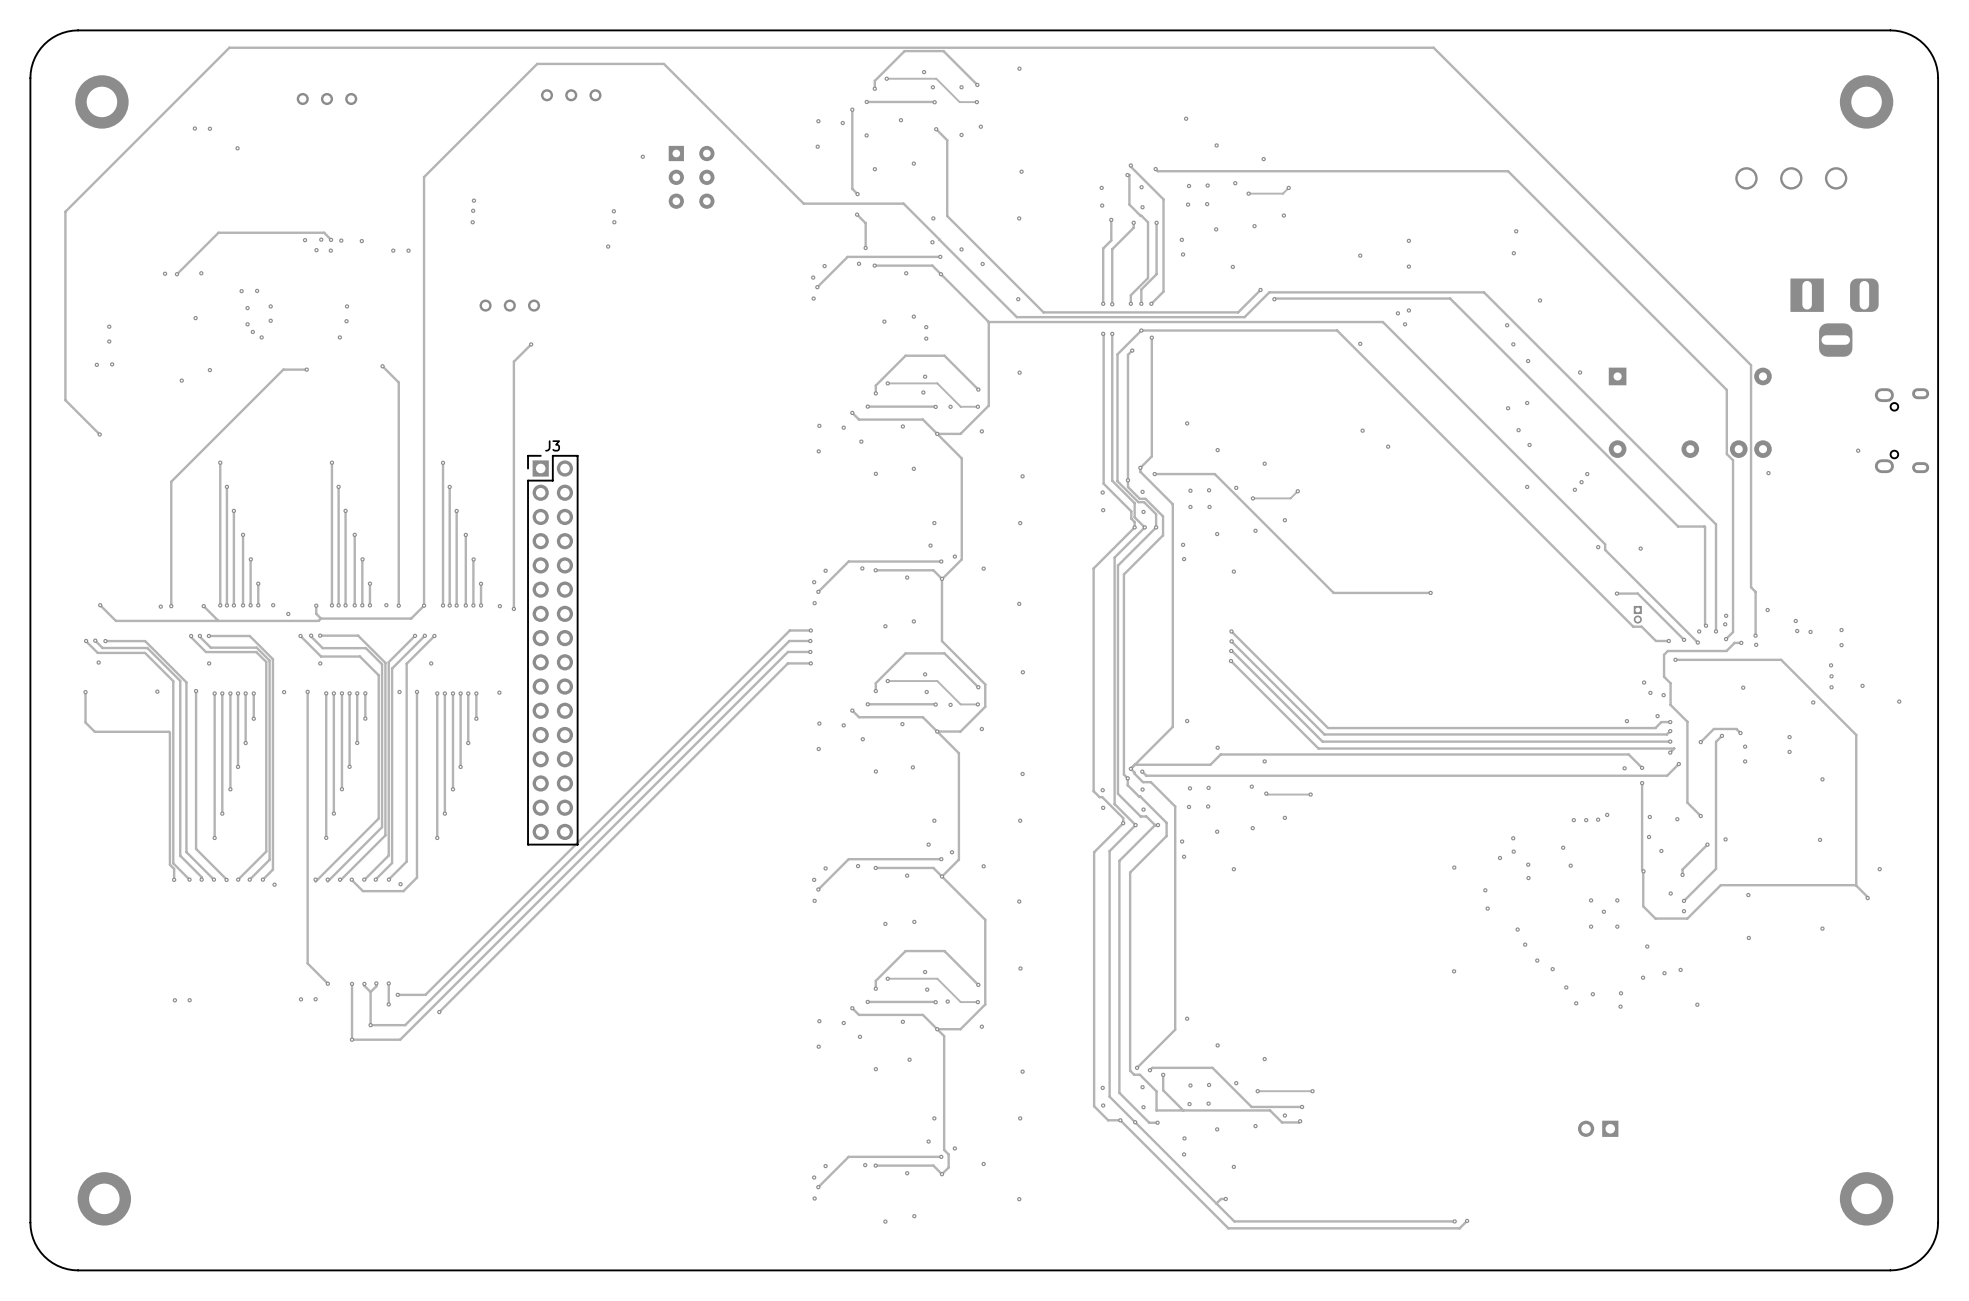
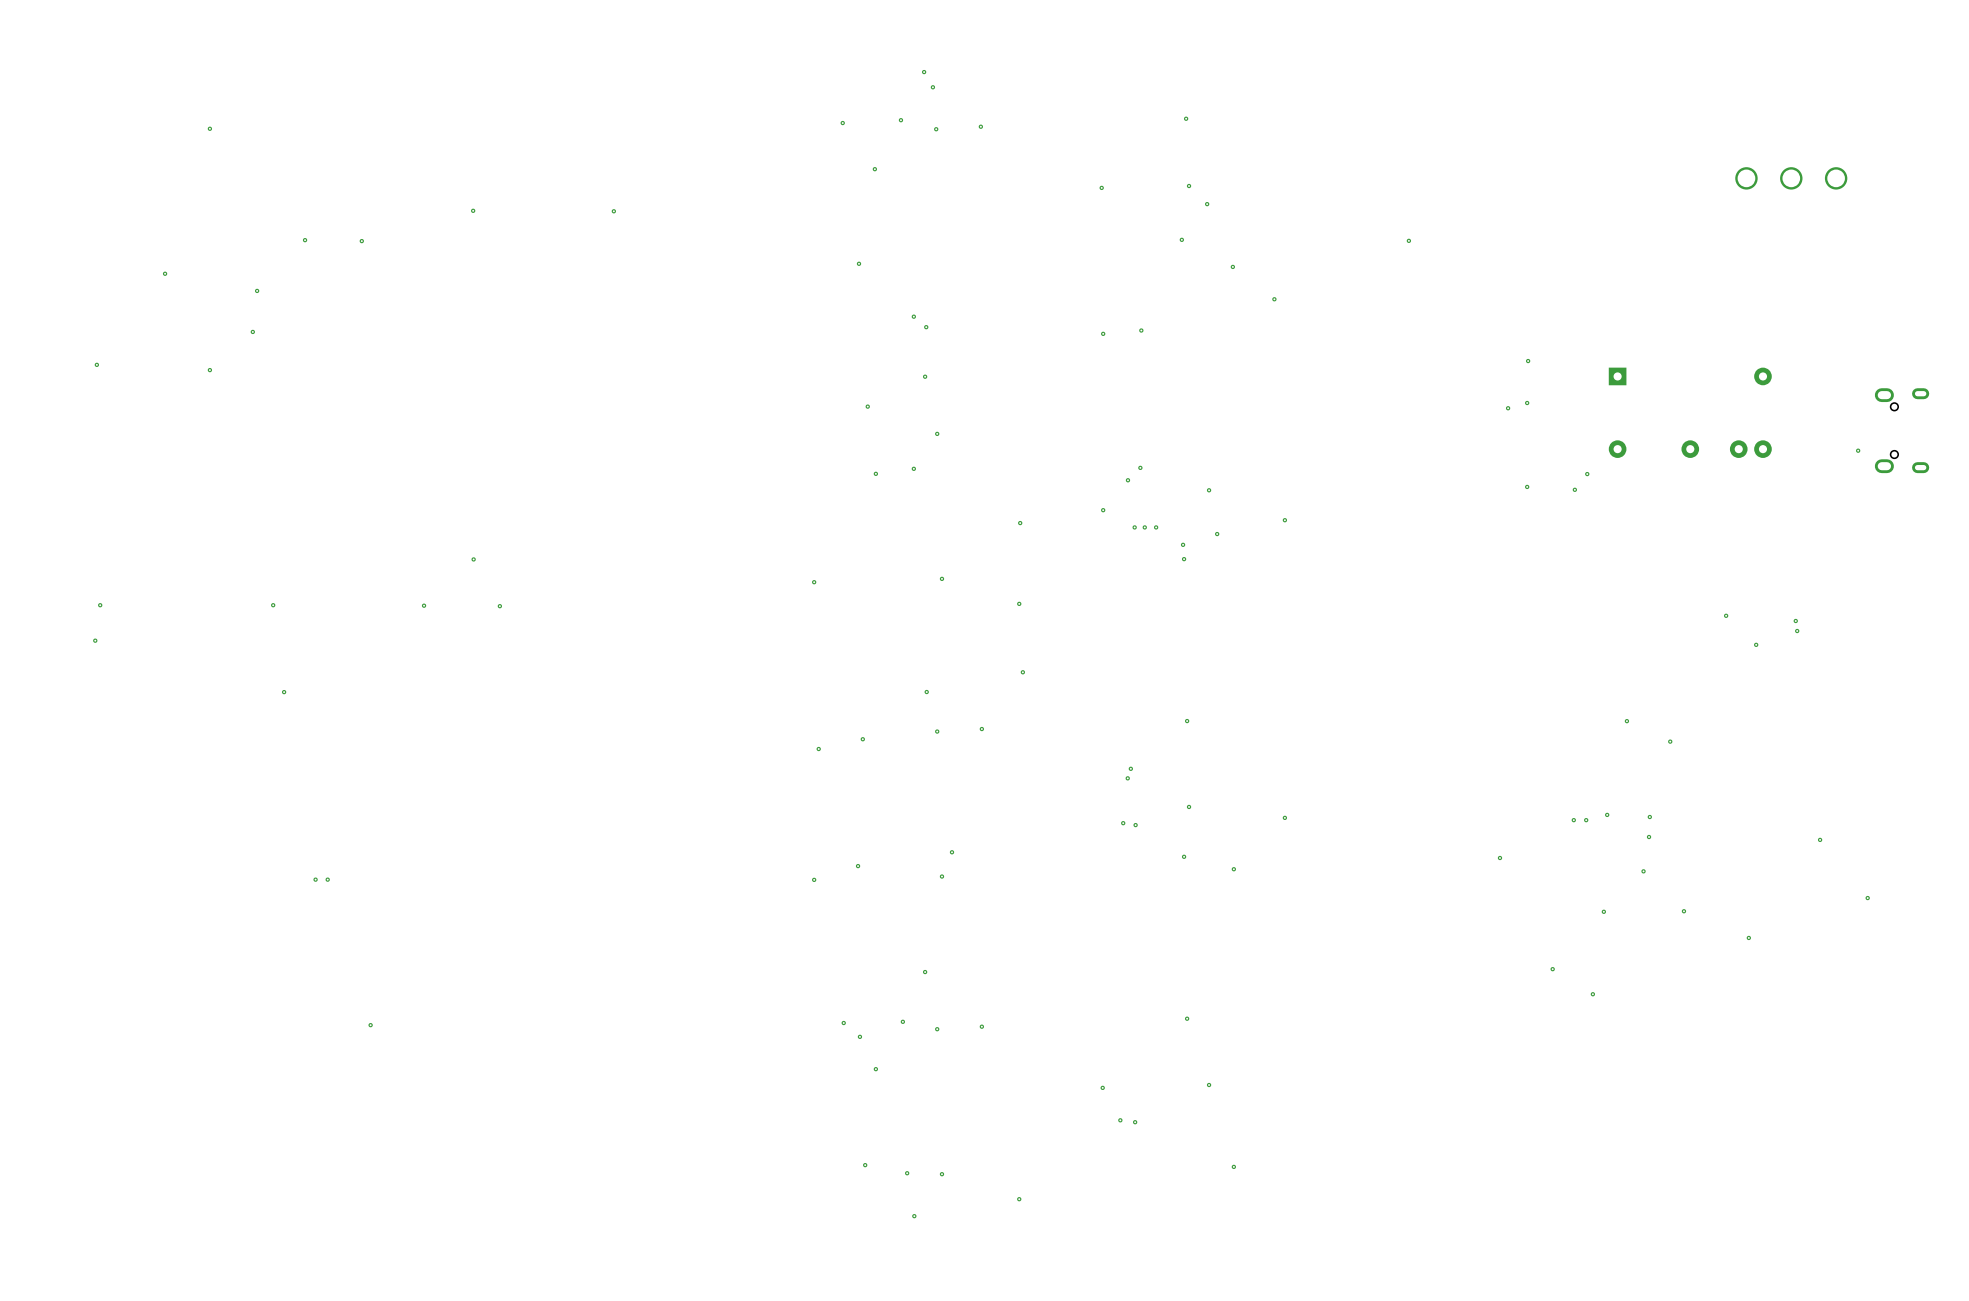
board edge: (1890, 30) (78, 30) (62, 33) (52, 37) (44, 44) (35, 57) (30, 78) (30, 1222) (31, 1233) (37, 1248) (52, 1263) (62, 1267) (78, 1270) (1890, 1270) (1901, 1269) (1915, 1263) (1930, 1248) (1935, 1238) (1938, 1222) (1938, 78) (1933, 57) (1924, 44) (1911, 35) (1890, 30) -> none
via: (1019, 68) -> none
track: (886, 78) (936, 78) (959, 102) (976, 102) -> none
via: (886, 78) -> none
track: (977, 84) (943, 51) (904, 51) (874, 80) (874, 88) -> none
via: (977, 84) -> none
via: (961, 87) -> none
via: (874, 88) -> none
part: (571, 95) -> none
part: (326, 98) -> none
part: (101, 101) -> none
track: (866, 101) (934, 102) -> none
via: (866, 101) -> none
part: (1866, 101) -> none
via: (934, 102) -> none
via: (976, 102) -> none
track: (852, 109) (852, 188) (857, 194) -> none
via: (852, 109) -> none
via: (818, 121) -> none
via: (194, 128) -> none
track: (936, 129) (947, 140) (947, 216) (1043, 312) (1238, 312) (1260, 289) -> none
via: (961, 134) -> none
via: (866, 135) -> none
via: (1216, 145) -> none
via: (817, 146) -> none
via: (237, 148) -> none
via: (642, 156) -> none
via: (1263, 159) -> none
via: (913, 163) -> none
track: (1130, 165) (1163, 199) (1163, 291) (1151, 303) -> none
via: (1130, 165) -> none
track: (1155, 169) (1157, 171) (1508, 171) (1726, 389) (1726, 454) (1733, 460) (1733, 632) (1726, 639) -> none
via: (1155, 169) -> none
via: (1021, 171) -> none
track: (1127, 175) (1129, 175) (1129, 204) (1148, 222) (1148, 278) (1130, 295) (1130, 303) -> none
via: (1127, 175) -> none
part: (691, 177) -> none
via: (1235, 183) -> none
via: (1207, 185) -> none
via: (1141, 187) -> none
track: (1288, 187) (1282, 193) (1248, 193) -> none
via: (1288, 187) -> none
via: (1248, 193) -> none
via: (857, 194) -> none
via: (473, 200) -> none
via: (1188, 204) -> none
via: (1102, 205) -> none
via: (1142, 207) -> none
track: (857, 214) (865, 223) (865, 248) -> none
via: (857, 214) -> none
via: (1283, 215) -> none
via: (933, 218) -> none
via: (1019, 218) -> none
track: (1111, 219) (1111, 240) (1103, 248) (1103, 303) -> none
via: (1111, 219) -> none
via: (472, 222) -> none
via: (614, 222) -> none
track: (1133, 222) (1133, 227) (1112, 249) (1112, 304) -> none
via: (1133, 222) -> none
track: (1156, 222) (1156, 274) (1141, 289) (1141, 303) -> none
via: (1156, 222) -> none
via: (1254, 226) -> none
via: (1216, 229) -> none
via: (1516, 231) -> none
via: (321, 239) -> none
track: (331, 239) (324, 232) (218, 232) (176, 274) -> none
via: (331, 239) -> none
via: (341, 240) -> none
via: (932, 242) -> none
via: (608, 246) -> none
via: (865, 248) -> none
via: (961, 249) -> none
via: (316, 250) -> none
via: (330, 250) -> none
via: (393, 250) -> none
via: (408, 250) -> none
via: (1513, 253) -> none
via: (1183, 254) -> none
via: (1360, 255) -> none
track: (940, 256) (847, 256) (817, 287) -> none
via: (940, 256) -> none
via: (982, 263) -> none
track: (874, 265) (932, 265) (988, 322) -> none
via: (874, 265) -> none
via: (824, 266) -> none
via: (1408, 266) -> none
via: (201, 273) -> none
via: (906, 273) -> none
via: (176, 274) -> none
via: (940, 274) -> none
via: (813, 277) -> none
via: (817, 287) -> none
via: (1260, 289) -> none
via: (241, 291) -> none
via: (813, 298) -> none
via: (1018, 299) -> none
track: (1274, 299) (1450, 298) (1678, 526) (1705, 527) (1706, 625) -> none
via: (1540, 300) -> none
via: (1103, 303) -> none
via: (1130, 303) -> none
via: (1141, 303) -> none
via: (1151, 303) -> none
via: (1112, 304) -> none
part: (509, 305) -> none
via: (270, 306) -> none
via: (347, 306) -> none
via: (247, 308) -> none
via: (1408, 310) -> none
via: (1397, 313) -> none
part: (1834, 317) -> none
via: (195, 318) -> none
via: (270, 320) -> none
via: (346, 321) -> none
via: (884, 321) -> none
track: (988, 322) (988, 405) (960, 433) (937, 433) -> none
track: (988, 322) (1382, 322) (1605, 544) (1605, 549) (1697, 642) -> none
via: (247, 324) -> none
via: (1405, 324) -> none
via: (1507, 325) -> none
via: (109, 326) -> none
track: (1103, 333) (1103, 483) (1131, 511) (1134, 527) (1093, 568) (1093, 791) (1123, 818) (1123, 823) (1094, 852) (1094, 1106) (1108, 1120) (1120, 1120) (1228, 1228) (1459, 1228) (1467, 1220) -> none
track: (1112, 333) (1112, 480) (1134, 503) (1134, 517) (1144, 527) (1114, 557) (1114, 804) (1135, 825) (1109, 851) (1109, 1096) (1234, 1221) (1454, 1221) -> none
via: (1112, 333) -> none
via: (261, 337) -> none
via: (339, 337) -> none
track: (1151, 337) (1151, 456) (1140, 467) (1140, 471) (1172, 504) (1172, 726) (1130, 768) (1143, 782) (1150, 782) (1175, 806) (1175, 1029) (1137, 1067) -> none
via: (1151, 337) -> none
via: (926, 338) -> none
via: (109, 341) -> none
via: (1360, 343) -> none
track: (531, 344) (513, 361) (513, 608) -> none
via: (531, 344) -> none
via: (1513, 344) -> none
track: (1132, 350) (1127, 354) (1127, 487) (1139, 498) (1145, 498) (1163, 516) (1163, 535) (1123, 574) (1123, 774) (1127, 778) (1127, 785) (1166, 822) (1166, 836) (1130, 872) (1130, 1070) (1134, 1074) (1139, 1074) (1156, 1091) (1156, 1110) (1270, 1110) (1282, 1122) (1300, 1121) -> none
via: (1132, 350) -> none
via: (112, 364) -> none
track: (382, 366) (398, 382) (398, 605) -> none
via: (382, 366) -> none
track: (306, 369) (283, 369) (171, 481) (171, 606) -> none
via: (306, 369) -> none
via: (1019, 372) -> none
via: (1580, 372) -> none
via: (181, 380) -> none
track: (887, 383) (937, 383) (960, 406) (977, 406) -> none
via: (887, 383) -> none
track: (978, 389) (944, 355) (905, 355) (875, 385) (875, 393) -> none
via: (978, 389) -> none
via: (923, 392) -> none
via: (875, 393) -> none
track: (867, 406) (935, 406) -> none
via: (935, 406) -> none
via: (950, 406) -> none
via: (977, 406) -> none
track: (852, 412) (858, 419) (922, 419) (961, 458) (961, 559) (941, 578) -> none
via: (852, 412) -> none
via: (1187, 423) -> none
via: (819, 425) -> none
via: (902, 426) -> none
via: (843, 427) -> none
via: (1362, 430) -> none
via: (1518, 430) -> none
via: (981, 431) -> none
track: (99, 434) (65, 400) (65, 211) (229, 47) (1433, 47) (1751, 365) (1751, 587) (1755, 591) (1755, 635) -> none
via: (99, 434) -> none
via: (861, 441) -> none
via: (1529, 444) -> none
via: (1388, 446) -> none
via: (1217, 450) -> none
via: (818, 451) -> none
track: (220, 462) (220, 605) -> none
via: (220, 462) -> none
track: (331, 462) (331, 605) -> none
via: (331, 462) -> none
track: (443, 462) (443, 605) -> none
via: (443, 462) -> none
via: (1264, 463) -> none
via: (1768, 473) -> none
track: (1154, 474) (1214, 474) (1333, 592) (1430, 592) -> none
via: (1154, 474) -> none
via: (1022, 476) -> none
via: (1581, 482) -> none
track: (226, 486) (226, 605) -> none
via: (226, 486) -> none
track: (338, 486) (338, 605) -> none
via: (338, 486) -> none
track: (449, 486) (449, 605) -> none
via: (449, 486) -> none
via: (1236, 487) -> none
via: (1190, 490) -> none
via: (1142, 491) -> none
track: (1297, 491) (1290, 498) (1252, 498) -> none
via: (1297, 491) -> none
via: (1102, 492) -> none
via: (1252, 498) -> none
via: (1190, 506) -> none
via: (1209, 506) -> none
track: (233, 510) (233, 605) -> none
via: (233, 510) -> none
track: (345, 510) (345, 605) -> none
via: (345, 510) -> none
track: (456, 510) (456, 605) -> none
via: (456, 510) -> none
via: (1143, 511) -> none
via: (934, 523) -> none
via: (1255, 530) -> none
track: (243, 534) (243, 605) -> none
via: (243, 534) -> none
track: (354, 534) (354, 605) -> none
via: (354, 534) -> none
track: (465, 534) (465, 605) -> none
via: (465, 534) -> none
via: (930, 545) -> none
via: (1598, 547) -> none
via: (1640, 548) -> none
via: (954, 556) -> none
track: (250, 559) (250, 605) -> none
via: (250, 559) -> none
track: (362, 559) (362, 605) -> none
via: (362, 559) -> none
track: (473, 559) (473, 605) -> none
track: (941, 561) (848, 561) (818, 591) -> none
via: (941, 561) -> none
via: (862, 568) -> none
via: (983, 568) -> none
via: (825, 570) -> none
track: (875, 570) (933, 570) (941, 578) -> none
via: (875, 570) -> none
via: (1233, 571) -> none
via: (907, 577) -> none
track: (941, 578) (941, 641) (985, 684) (985, 706) (960, 731) (937, 731) -> none
track: (258, 583) (258, 605) -> none
via: (258, 583) -> none
track: (369, 583) (369, 605) -> none
via: (369, 583) -> none
track: (481, 583) (481, 605) -> none
via: (481, 583) -> none
via: (818, 591) -> none
via: (1430, 592) -> none
track: (1616, 593) (1637, 593) (1684, 639) -> none
via: (1616, 593) -> none
via: (814, 603) -> none
track: (100, 605) (115, 620) (318, 620) (321, 618) -> none
via: (220, 605) -> none
via: (226, 605) -> none
via: (233, 605) -> none
via: (243, 605) -> none
via: (250, 605) -> none
via: (258, 605) -> none
track: (316, 605) (316, 613) (321, 618) -> none
via: (316, 605) -> none
via: (331, 605) -> none
via: (338, 605) -> none
via: (345, 605) -> none
via: (354, 605) -> none
via: (362, 605) -> none
via: (369, 605) -> none
via: (386, 605) -> none
via: (398, 605) -> none
via: (443, 605) -> none
via: (449, 605) -> none
via: (456, 605) -> none
via: (465, 605) -> none
via: (473, 605) -> none
via: (481, 605) -> none
via: (160, 606) -> none
via: (171, 606) -> none
track: (203, 606) (218, 620) -> none
via: (203, 606) -> none
via: (513, 608) -> none
via: (1767, 610) -> none
via: (288, 614) -> none
part: (1637, 614) -> none
track: (321, 618) (411, 618) (424, 605) (424, 177) (537, 63) (663, 63) (803, 203) (903, 203) (1016, 317) (1244, 317) (1269, 292) (1484, 292) (1716, 524) (1716, 631) -> none
via: (913, 621) -> none
via: (1725, 624) -> none
via: (1706, 625) -> none
via: (885, 626) -> none
track: (810, 630) (789, 630) (425, 994) (397, 994) -> none
via: (810, 630) -> none
via: (1841, 630) -> none
track: (1231, 631) (1328, 728) (1655, 728) (1661, 722) (1670, 722) -> none
via: (1231, 631) -> none
via: (1699, 631) -> none
via: (1716, 631) -> none
via: (1810, 631) -> none
track: (191, 635) (205, 652) (256, 652) (266, 661) (266, 851) (238, 879) -> none
via: (191, 635) -> none
track: (199, 635) (210, 647) (256, 647) (269, 660) (269, 859) (249, 879) -> none
via: (199, 635) -> none
track: (208, 635) (249, 635) (272, 659) (272, 869) (262, 879) -> none
via: (208, 635) -> none
track: (300, 635) (321, 656) (359, 656) (378, 675) (378, 818) (315, 881) -> none
via: (300, 635) -> none
track: (311, 635) (322, 648) (365, 648) (382, 664) (382, 827) (327, 881) -> none
via: (311, 635) -> none
track: (320, 635) (358, 635) (385, 662) (385, 835) (340, 880) -> none
via: (320, 635) -> none
track: (415, 635) (388, 662) (388, 855) (364, 879) -> none
via: (415, 635) -> none
track: (424, 635) (392, 668) (392, 863) (375, 879) -> none
via: (424, 635) -> none
track: (434, 635) (406, 663) (406, 861) (388, 879) -> none
via: (434, 635) -> none
via: (1755, 635) -> none
via: (1684, 639) -> none
via: (1726, 639) -> none
track: (86, 640) (97, 652) (145, 652) (173, 681) (173, 863) (189, 879) -> none
via: (86, 640) -> none
track: (95, 640) (102, 648) (147, 648) (180, 680) (180, 855) (201, 877) (201, 879) -> none
track: (810, 640) (789, 640) (405, 1025) (370, 1025) (370, 992) -> none
via: (810, 640) -> none
track: (1668, 640) (1655, 640) (1641, 626) (1633, 626) (1337, 330) (1141, 330) (1117, 354) (1117, 481) (1138, 502) (1144, 502) (1156, 514) (1156, 527) (1117, 565) (1117, 793) (1140, 816) (1146, 816) (1154, 825) (1158, 825) -> none
via: (1668, 640) -> none
track: (105, 641) (145, 641) (186, 682) (186, 852) (213, 879) -> none
via: (105, 641) -> none
track: (1231, 641) (1324, 734) (1666, 734) (1670, 731) -> none
via: (1231, 641) -> none
via: (1697, 642) -> none
track: (1741, 642) (1734, 642) (1726, 651) (1667, 651) (1664, 654) (1664, 676) (1670, 683) (1670, 704) (1687, 721) (1687, 802) (1700, 816) -> none
via: (1741, 642) -> none
via: (1841, 645) -> none
J3: (552, 650) -> none
track: (810, 651) (787, 651) (400, 1039) (352, 1039) (352, 983) -> none
via: (810, 651) -> none
track: (1231, 651) (1322, 741) (1670, 741) -> none
via: (1231, 651) -> none
track: (1675, 659) (1781, 659) (1856, 734) (1856, 885) -> none
via: (1675, 659) -> none
track: (1231, 661) (1318, 748) (1674, 748) (1670, 752) -> none
via: (1231, 661) -> none
via: (98, 662) -> none
via: (209, 663) -> none
via: (320, 663) -> none
via: (431, 663) -> none
track: (810, 663) (787, 663) (439, 1012) -> none
via: (810, 663) -> none
via: (1831, 665) -> none
via: (925, 674) -> none
via: (1831, 676) -> none
track: (887, 681) (937, 681) (960, 704) (977, 704) -> none
via: (887, 681) -> none
via: (1644, 682) -> none
via: (1862, 685) -> none
track: (978, 687) (944, 653) (905, 653) (875, 683) (875, 691) -> none
via: (978, 687) -> none
via: (1743, 687) -> none
via: (1831, 687) -> none
via: (157, 691) -> none
track: (196, 691) (196, 848) (226, 879) -> none
via: (196, 691) -> none
track: (307, 691) (307, 963) (327, 983) -> none
via: (307, 691) -> none
track: (416, 691) (416, 877) (403, 891) (362, 891) (351, 879) -> none
via: (416, 691) -> none
via: (875, 691) -> none
track: (85, 692) (85, 722) (94, 731) (169, 732) (169, 864) (174, 868) (174, 879) -> none
via: (85, 692) -> none
via: (399, 692) -> none
via: (499, 692) -> none
via: (1650, 692) -> none
track: (214, 693) (214, 837) -> none
via: (214, 693) -> none
track: (222, 693) (222, 813) -> none
via: (222, 693) -> none
track: (230, 693) (230, 789) -> none
via: (230, 693) -> none
track: (238, 693) (238, 766) -> none
via: (238, 693) -> none
track: (245, 693) (245, 743) -> none
via: (245, 693) -> none
track: (253, 693) (253, 718) -> none
via: (253, 693) -> none
track: (326, 693) (326, 837) -> none
via: (326, 693) -> none
track: (333, 693) (333, 813) -> none
via: (333, 693) -> none
track: (341, 693) (341, 789) -> none
via: (341, 693) -> none
track: (349, 693) (349, 766) -> none
via: (349, 693) -> none
track: (357, 693) (357, 742) -> none
via: (357, 693) -> none
track: (365, 693) (365, 718) -> none
via: (365, 693) -> none
track: (437, 693) (437, 837) -> none
via: (437, 693) -> none
track: (444, 693) (444, 813) -> none
via: (444, 693) -> none
track: (452, 693) (452, 789) -> none
via: (452, 693) -> none
track: (460, 693) (460, 766) -> none
via: (460, 693) -> none
track: (468, 693) (468, 743) -> none
via: (468, 693) -> none
track: (476, 693) (476, 718) -> none
via: (476, 693) -> none
via: (1663, 695) -> none
via: (1899, 701) -> none
via: (1813, 702) -> none
track: (867, 704) (935, 704) -> none
via: (867, 704) -> none
via: (935, 704) -> none
via: (950, 704) -> none
via: (977, 704) -> none
track: (852, 710) (858, 717) (922, 717) (958, 753) (958, 859) (941, 876) -> none
via: (852, 710) -> none
via: (1657, 716) -> none
via: (253, 718) -> none
via: (365, 718) -> none
via: (476, 718) -> none
via: (1670, 722) -> none
via: (819, 723) -> none
via: (902, 724) -> none
via: (843, 725) -> none
via: (1670, 731) -> none
track: (1740, 733) (1736, 728) (1713, 728) (1700, 742) -> none
via: (1740, 733) -> none
track: (1721, 735) (1716, 741) (1716, 868) (1683, 900) -> none
via: (1721, 735) -> none
via: (1789, 737) -> none
via: (357, 742) -> none
via: (1700, 742) -> none
via: (245, 743) -> none
via: (468, 743) -> none
via: (1745, 746) -> none
via: (1217, 747) -> none
via: (1789, 751) -> none
via: (1670, 752) -> none
via: (1264, 761) -> none
via: (1745, 761) -> none
track: (1134, 764) (1210, 764) (1220, 754) (1628, 754) (1642, 767) -> none
track: (1678, 764) (1667, 775) (1146, 775) (1142, 771) -> none
via: (1678, 764) -> none
via: (238, 766) -> none
via: (349, 766) -> none
via: (460, 766) -> none
via: (912, 767) -> none
via: (1642, 767) -> none
via: (1624, 768) -> none
via: (875, 771) -> none
via: (1142, 771) -> none
via: (1022, 773) -> none
via: (1822, 779) -> none
track: (1642, 783) (1643, 906) (1655, 918) (1687, 918) (1720, 885) (1855, 885) (1867, 898) -> none
via: (1642, 783) -> none
via: (1251, 786) -> none
via: (1208, 787) -> none
via: (1189, 788) -> none
via: (230, 789) -> none
via: (341, 789) -> none
via: (452, 789) -> none
via: (1142, 789) -> none
via: (1102, 790) -> none
track: (1266, 793) (1310, 794) -> none
via: (1266, 793) -> none
via: (1310, 794) -> none
via: (1208, 806) -> none
via: (1103, 807) -> none
via: (1143, 809) -> none
via: (222, 813) -> none
via: (333, 813) -> none
via: (444, 813) -> none
via: (1700, 816) -> none
via: (1598, 819) -> none
via: (1677, 819) -> none
via: (934, 820) -> none
via: (1020, 820) -> none
track: (1155, 825) (1119, 860) (1119, 1092) (1149, 1122) (1157, 1122) -> none
via: (1158, 825) -> none
via: (1252, 828) -> none
via: (1217, 831) -> none
via: (214, 837) -> none
via: (326, 837) -> none
via: (437, 837) -> none
via: (1513, 838) -> none
via: (1725, 839) -> none
via: (1182, 841) -> none
via: (928, 844) -> none
track: (1707, 844) (1682, 869) (1682, 874) -> none
via: (1707, 844) -> none
via: (1563, 847) -> none
via: (1661, 850) -> none
via: (1513, 851) -> none
track: (941, 859) (848, 859) (818, 889) -> none
via: (941, 859) -> none
via: (1528, 864) -> none
via: (1570, 865) -> none
via: (983, 866) -> none
track: (875, 867) (933, 867) (985, 919) (985, 1004) (960, 1029) (937, 1029) -> none
via: (875, 867) -> none
via: (1454, 867) -> none
via: (825, 868) -> none
via: (1879, 869) -> none
via: (1682, 874) -> none
via: (907, 875) -> none
via: (1528, 878) -> none
via: (174, 879) -> none
via: (189, 879) -> none
via: (201, 879) -> none
via: (213, 879) -> none
via: (226, 879) -> none
via: (238, 879) -> none
via: (249, 879) -> none
via: (262, 879) -> none
via: (340, 879) -> none
via: (351, 879) -> none
via: (364, 879) -> none
via: (375, 879) -> none
via: (388, 879) -> none
via: (274, 884) -> none
via: (400, 884) -> none
via: (818, 889) -> none
via: (1485, 890) -> none
via: (1670, 893) -> none
via: (1748, 895) -> none
via: (814, 900) -> none
via: (1591, 900) -> none
via: (1617, 900) -> none
via: (1683, 900) -> none
via: (1019, 901) -> none
via: (1487, 908) -> none
via: (914, 921) -> none
via: (885, 923) -> none
via: (1591, 926) -> none
via: (1617, 926) -> none
via: (1822, 928) -> none
via: (1517, 929) -> none
via: (1525, 944) -> none
via: (1647, 946) -> none
via: (1537, 960) -> none
via: (1020, 968) -> none
via: (1680, 969) -> none
via: (1454, 971) -> none
via: (1664, 973) -> none
via: (1643, 977) -> none
track: (887, 978) (937, 978) (960, 1002) (977, 1002) -> none
via: (887, 978) -> none
via: (327, 983) -> none
via: (352, 983) -> none
track: (364, 983) (370, 992) -> none
via: (364, 983) -> none
track: (376, 983) (376, 986) (370, 992) -> none
via: (376, 983) -> none
track: (388, 983) (388, 1004) -> none
via: (388, 983) -> none
track: (978, 984) (944, 951) (905, 951) (875, 980) (875, 988) -> none
via: (978, 984) -> none
via: (1566, 987) -> none
via: (875, 988) -> none
via: (927, 989) -> none
via: (1621, 993) -> none
via: (397, 994) -> none
via: (300, 999) -> none
via: (315, 999) -> none
via: (174, 1000) -> none
via: (189, 1000) -> none
track: (867, 1001) (935, 1002) -> none
via: (867, 1001) -> none
via: (947, 1001) -> none
via: (935, 1002) -> none
via: (977, 1002) -> none
via: (1576, 1003) -> none
via: (388, 1004) -> none
via: (1697, 1004) -> none
via: (1620, 1006) -> none
track: (852, 1008) (858, 1014) (922, 1014) (944, 1036) (944, 1149) (948, 1154) (948, 1167) (941, 1174) (933, 1165) (875, 1165) -> none
via: (852, 1008) -> none
via: (439, 1012) -> none
via: (819, 1021) -> none
via: (352, 1039) -> none
via: (1217, 1045) -> none
via: (818, 1046) -> none
via: (909, 1059) -> none
via: (1264, 1059) -> none
via: (1137, 1067) -> none
track: (1149, 1070) (1152, 1067) (1212, 1067) (1251, 1106) (1302, 1106) -> none
via: (1149, 1070) -> none
via: (1022, 1071) -> none
track: (1163, 1074) (1163, 1090) (1183, 1110) -> none
via: (1163, 1074) -> none
via: (1236, 1083) -> none
via: (1190, 1085) -> none
via: (1142, 1087) -> none
via: (1257, 1091) -> none
track: (1312, 1091) (1257, 1091) -> none
via: (1312, 1091) -> none
via: (1208, 1103) -> none
via: (1189, 1104) -> none
via: (1103, 1105) -> none
via: (1302, 1106) -> none
via: (1143, 1107) -> none
via: (1284, 1115) -> none
via: (934, 1118) -> none
via: (1020, 1118) -> none
via: (1300, 1121) -> none
via: (1157, 1122) -> none
via: (1255, 1126) -> none
part: (1598, 1128) -> none
via: (1217, 1129) -> none
via: (1184, 1138) -> none
via: (928, 1141) -> none
via: (954, 1148) -> none
via: (1184, 1154) -> none
track: (941, 1156) (848, 1156) (818, 1187) -> none
via: (941, 1156) -> none
via: (983, 1163) -> none
via: (875, 1165) -> none
via: (825, 1166) -> none
via: (814, 1177) -> none
via: (818, 1187) -> none
part: (104, 1198) -> none
via: (814, 1198) -> none
track: (1225, 1198) (1220, 1198) (1216, 1203) -> none
via: (1225, 1198) -> none
part: (1866, 1198) -> none
via: (1467, 1220) -> none
via: (885, 1221) -> none
via: (1454, 1221) -> none

